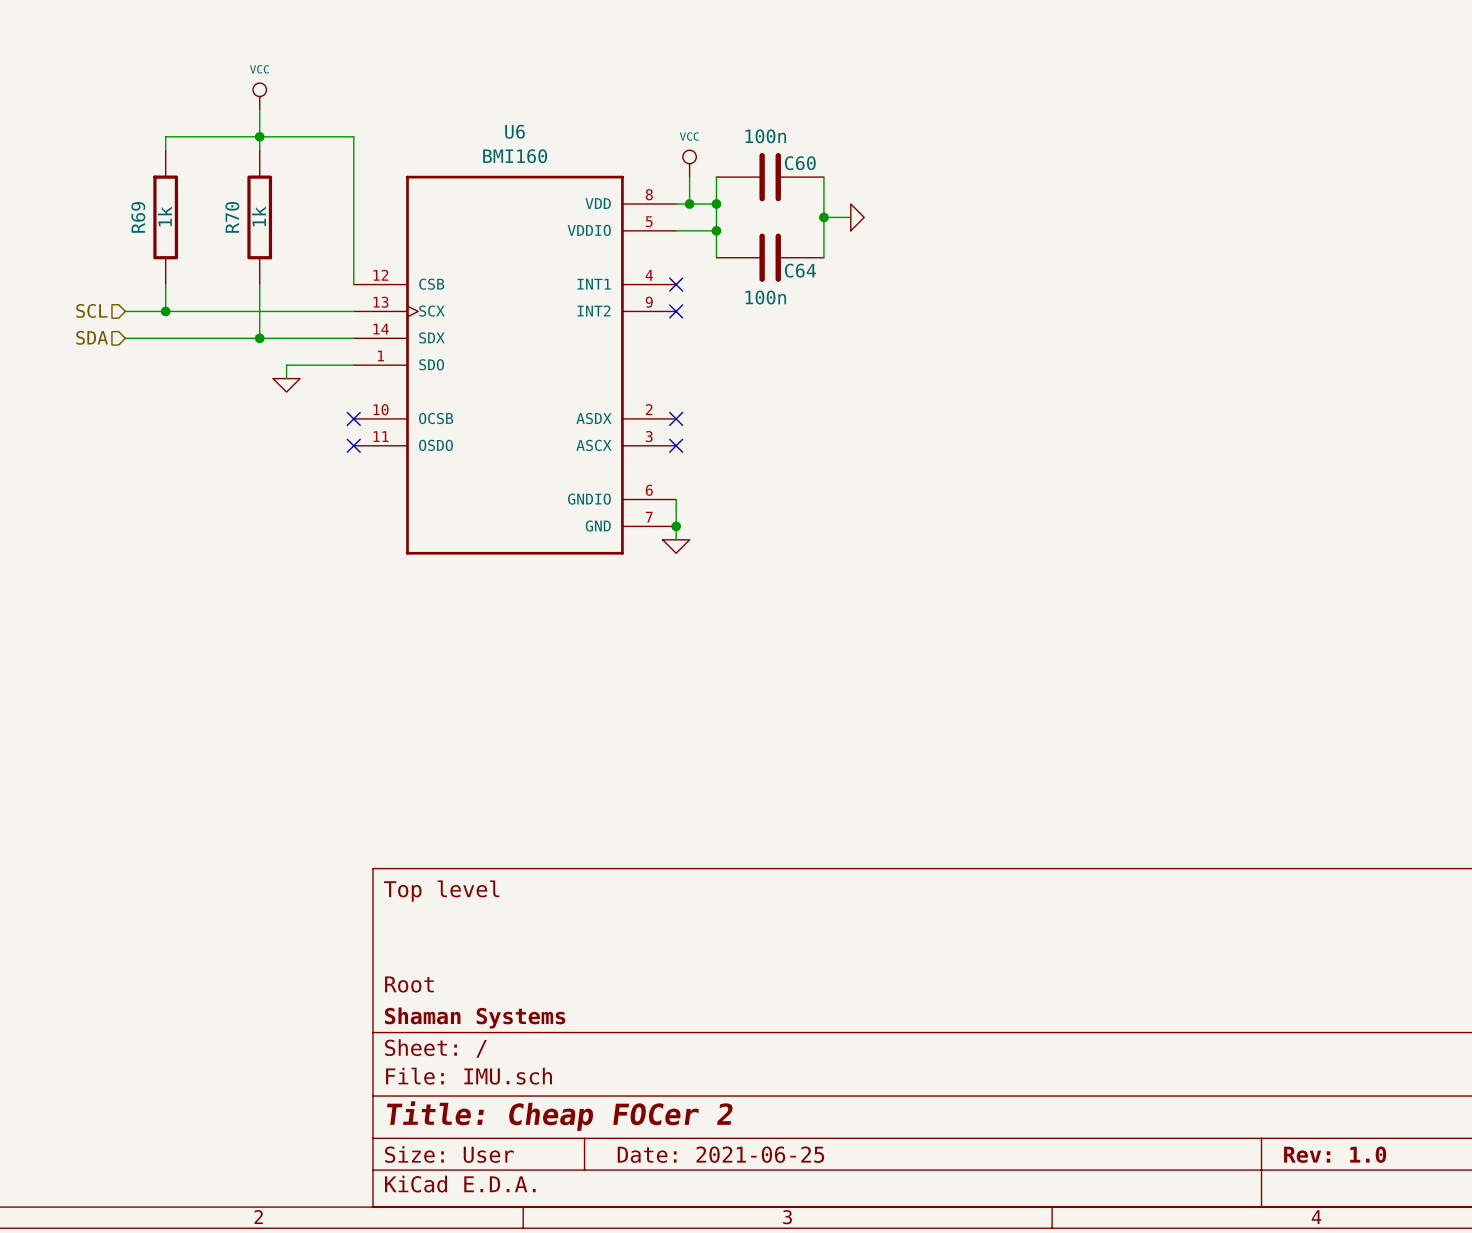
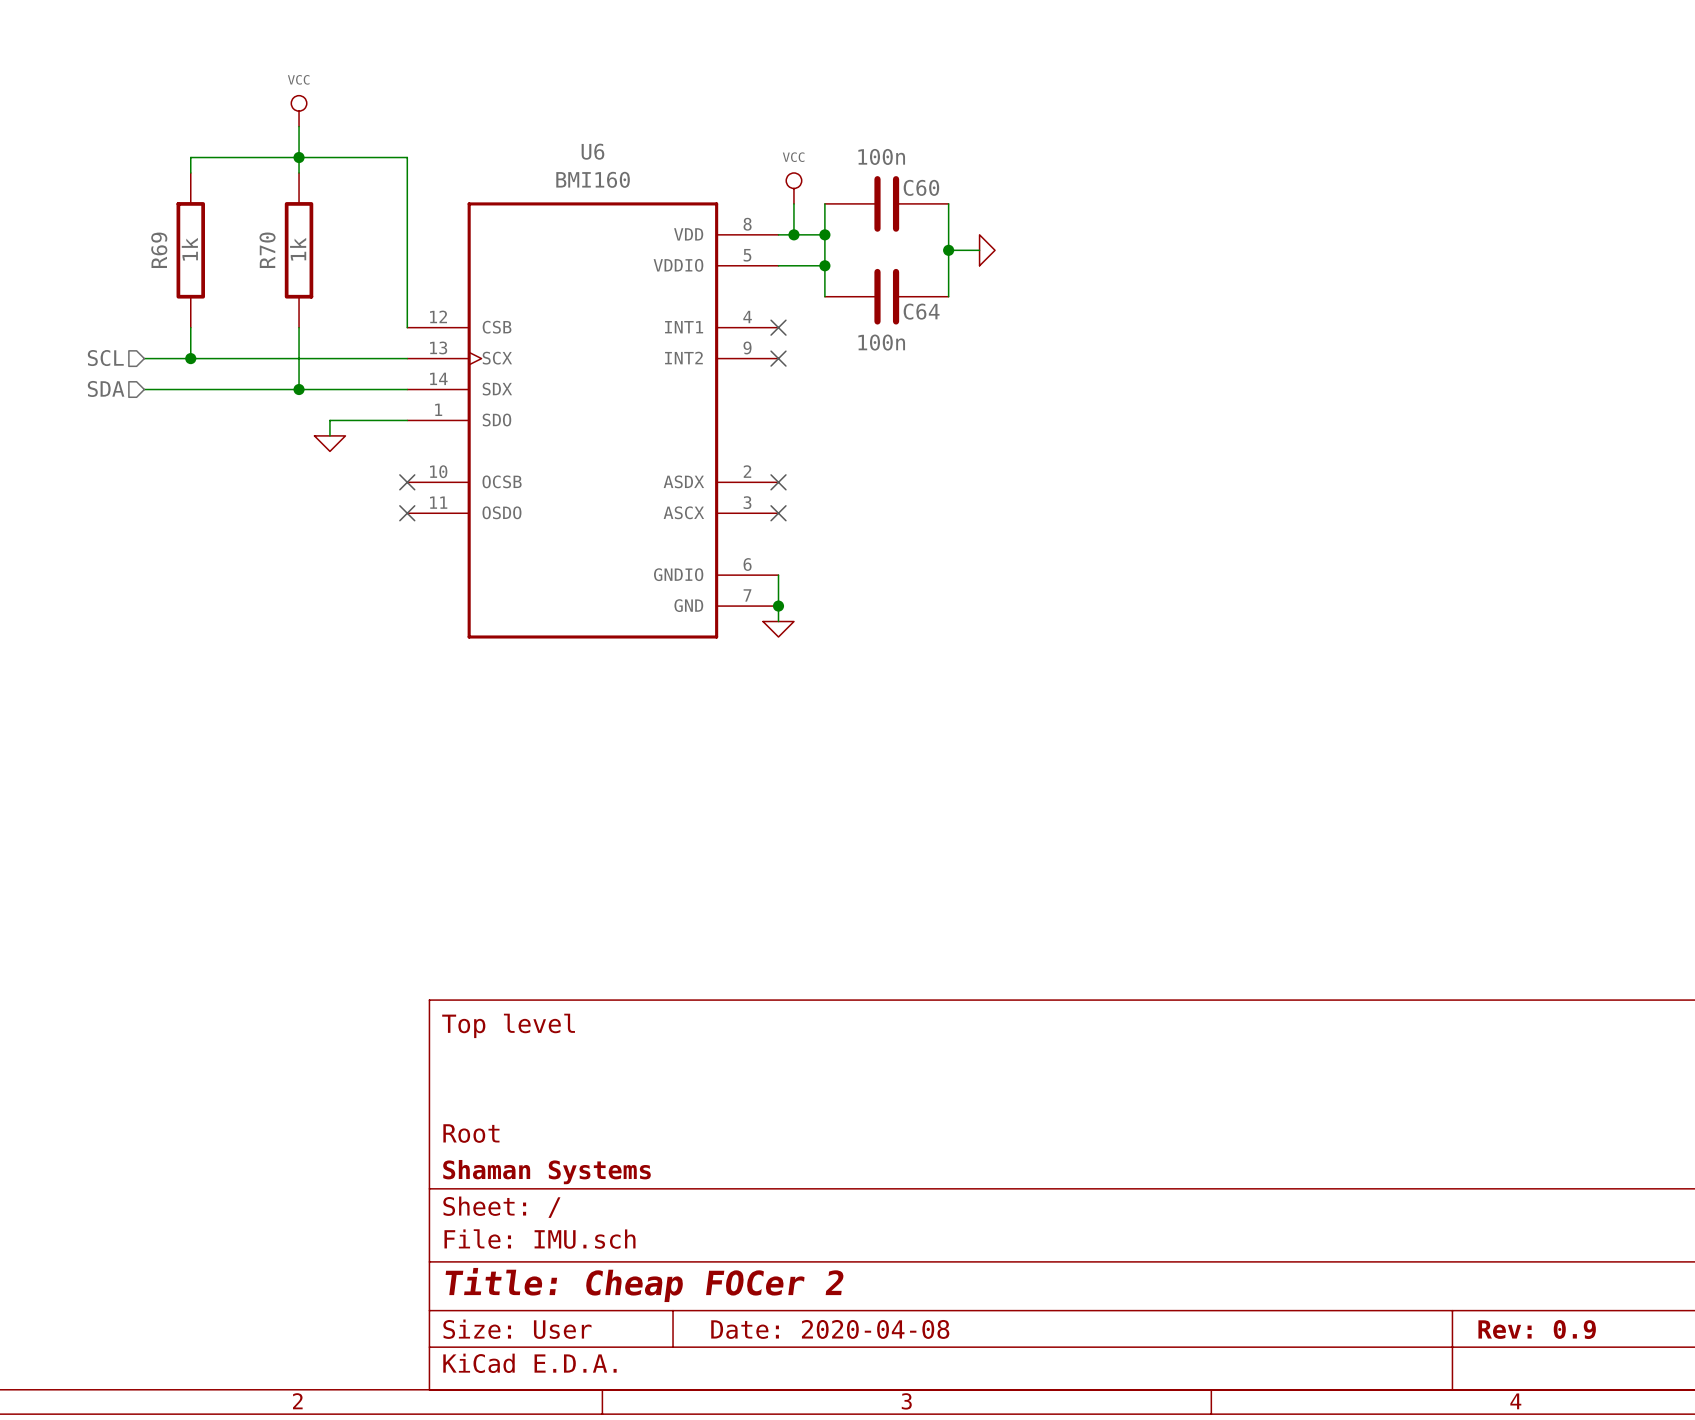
title block: Date: 2021-06-25 (720, 1154) -> Date: 2020-04-08 (830, 1329)
title block: Rev: 1.0 (1335, 1154) -> Rev: 0.9 (1537, 1329)

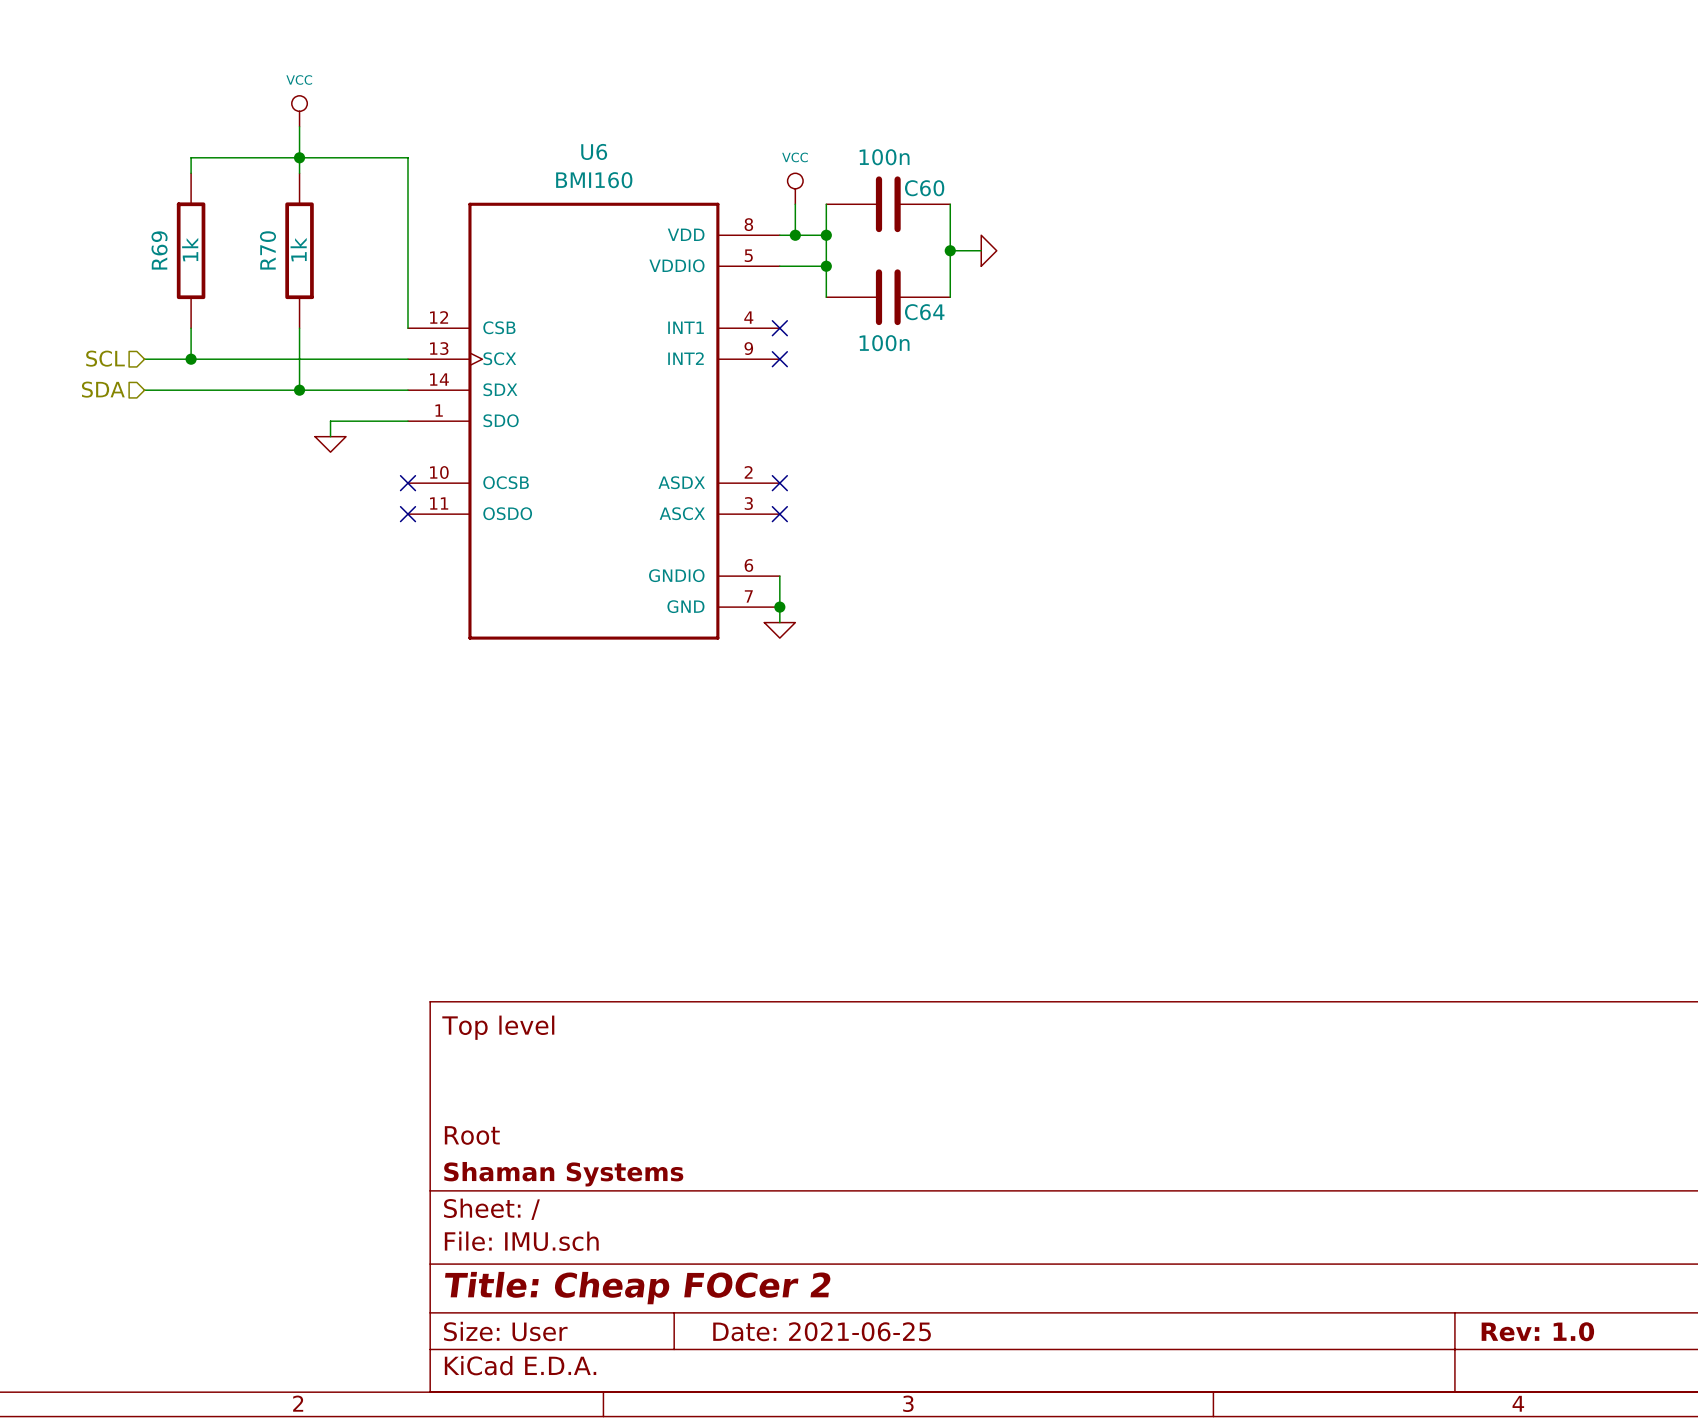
title block: Date: 2020-04-08 (830, 1329) -> Date: 2021-06-25 (822, 1331)
title block: Rev: 0.9 (1537, 1329) -> Rev: 1.0 (1537, 1331)

